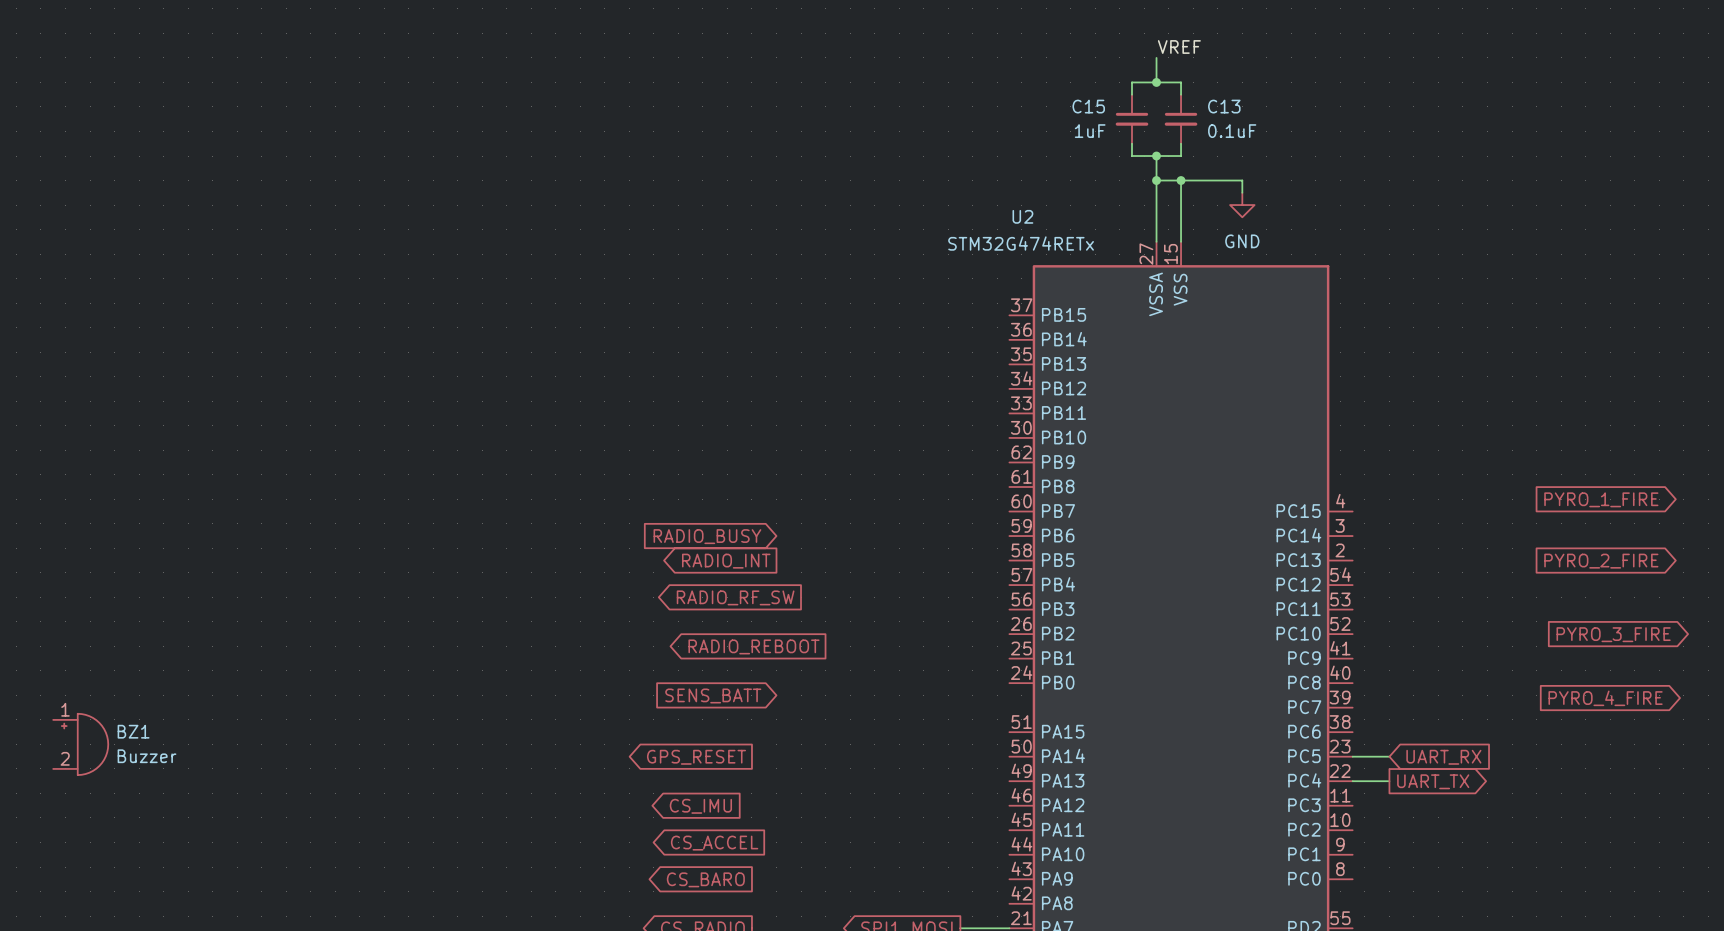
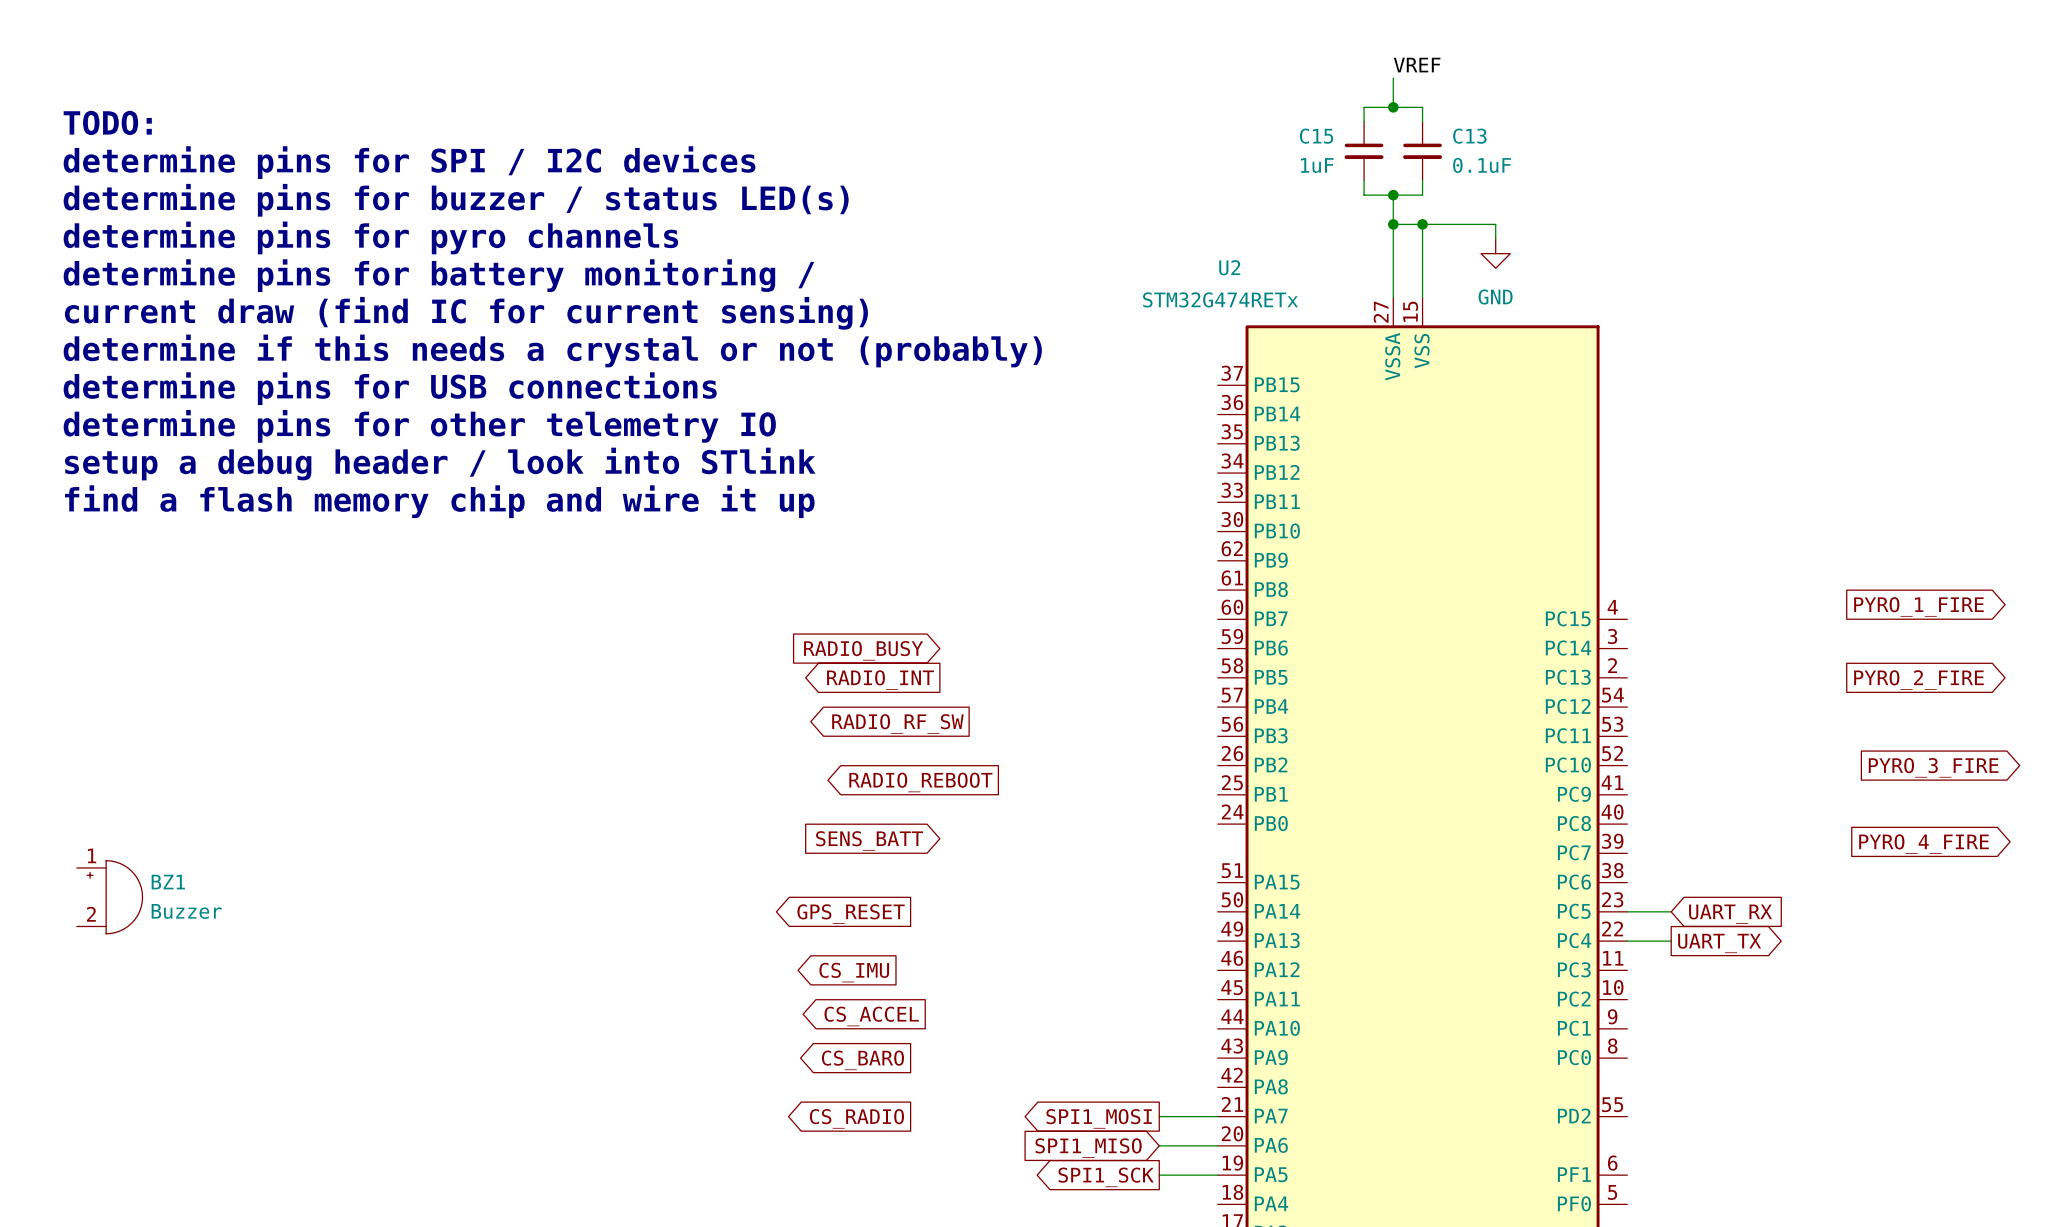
text: none -> TODO: (107, 122)
text: none -> determine pins for SPI / I2C devices (409, 162)
text: none -> determine pins for buzzer / status LED(s) (456, 200)
text: none -> determine pins for pyro channels (370, 237)
text: none -> determine pins for battery monitoring / (438, 275)
text: none -> current draw (find IC for current sensing) (466, 313)
text: none -> determine if this needs a crystal or not (probably) (552, 350)
text: none -> determine pins for USB connections (390, 388)
text: none -> determine pins for other telemetry IO (419, 426)
text: none -> setup a debug header / look into STlink (440, 464)
text: none -> find a flash memory chip and wire it up (439, 501)

